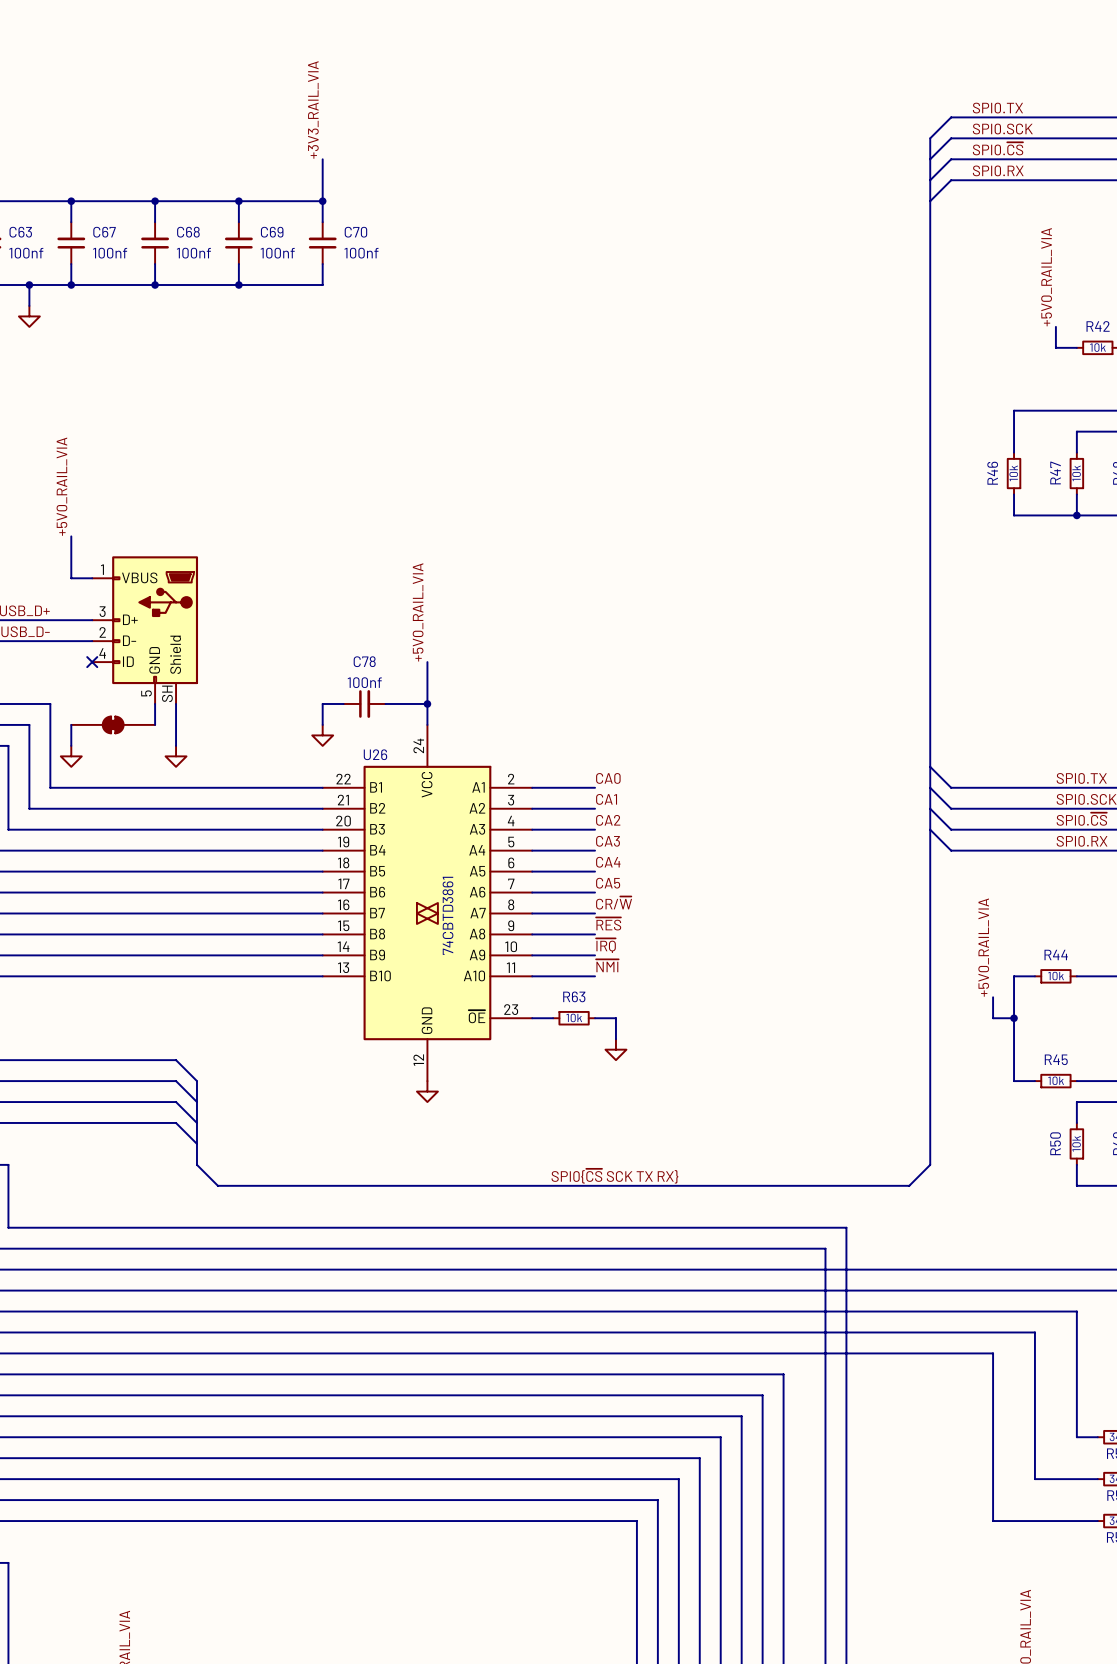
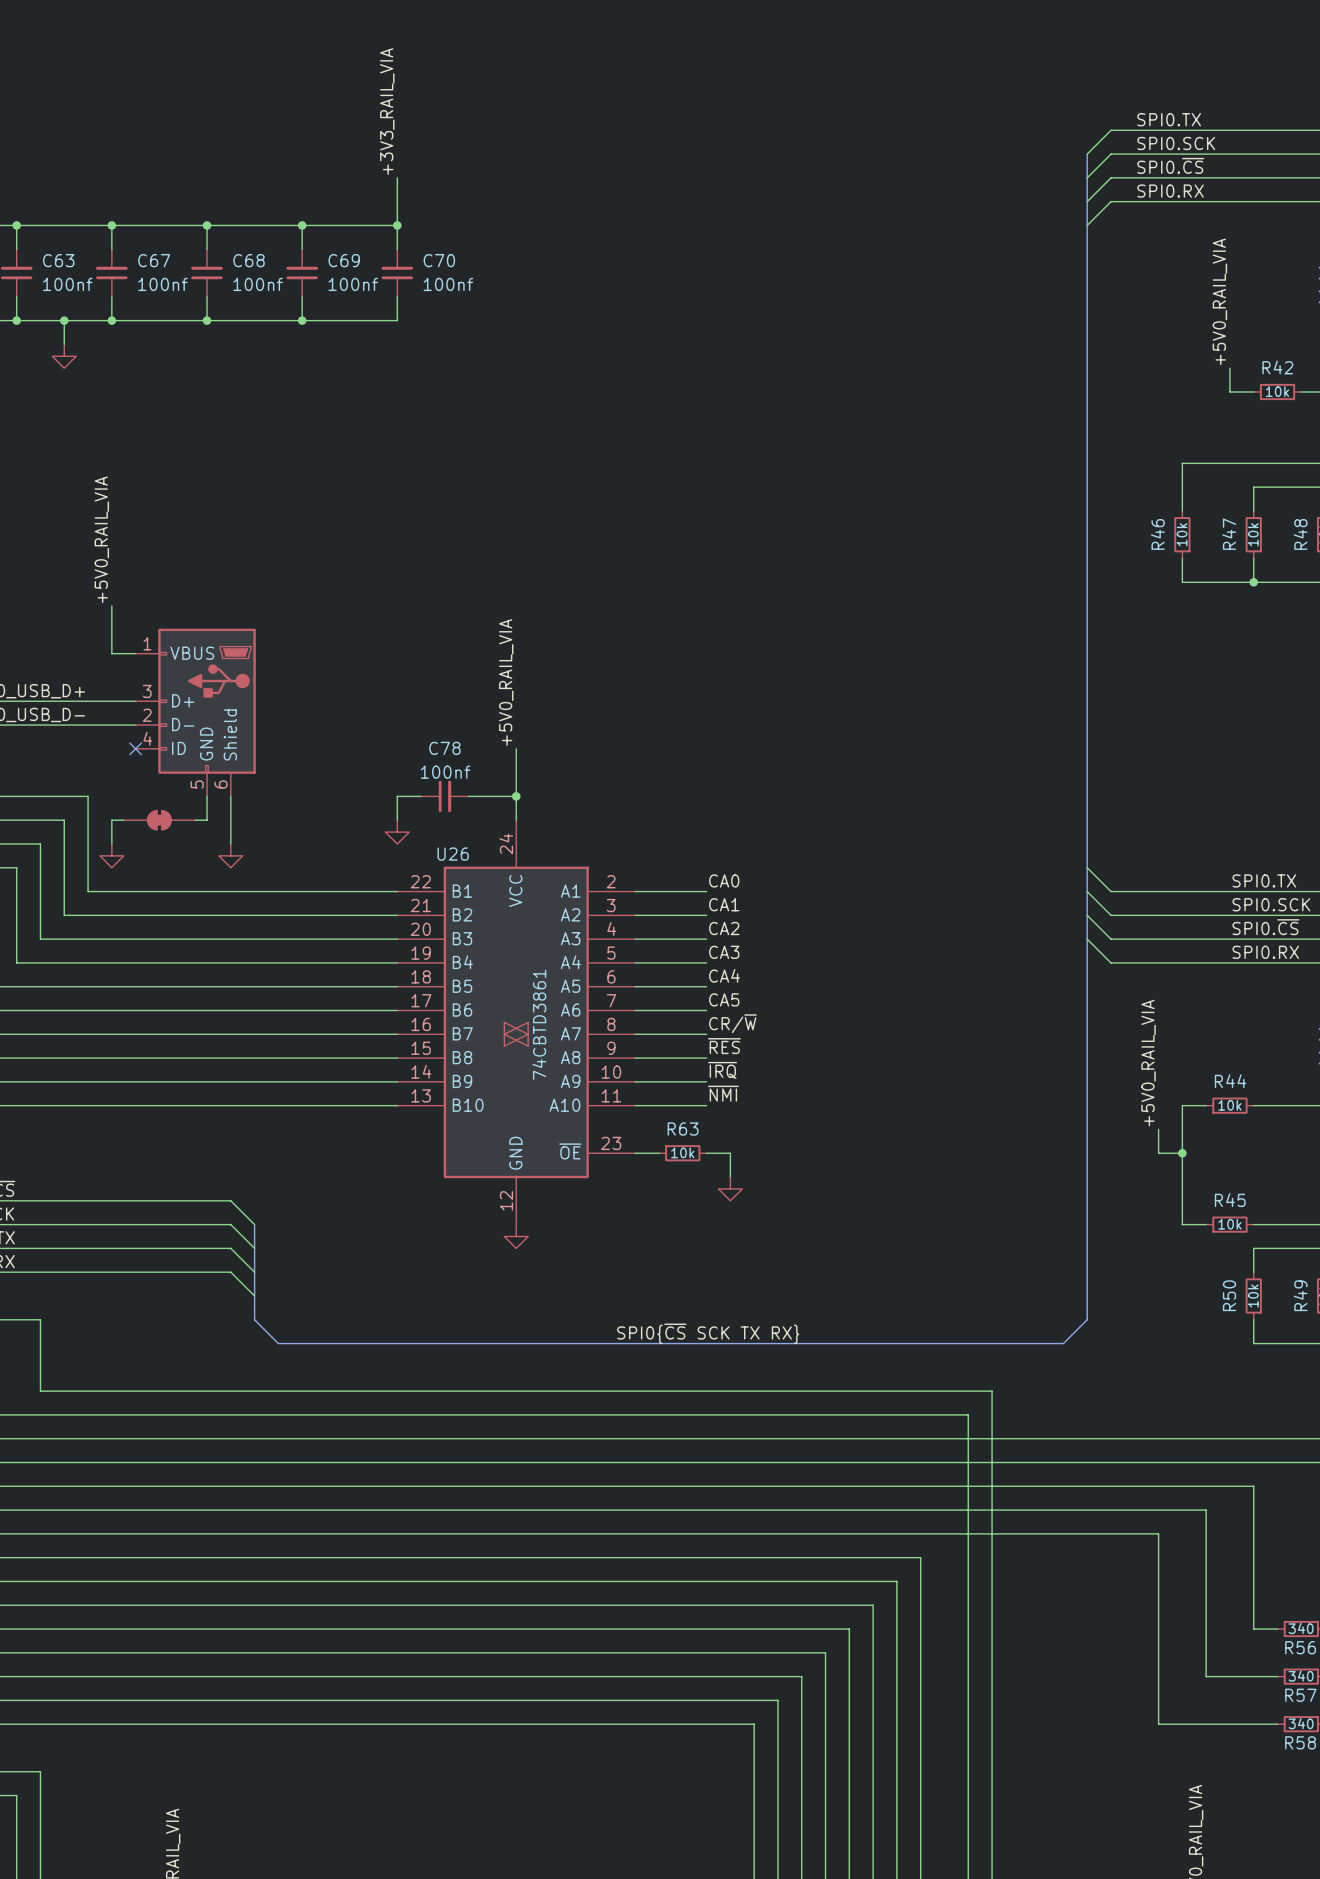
part pin number: SH (167, 693) -> 6 (220, 784)
part symbol: [71, 715, 156, 734] -> [123, 810, 196, 830]

